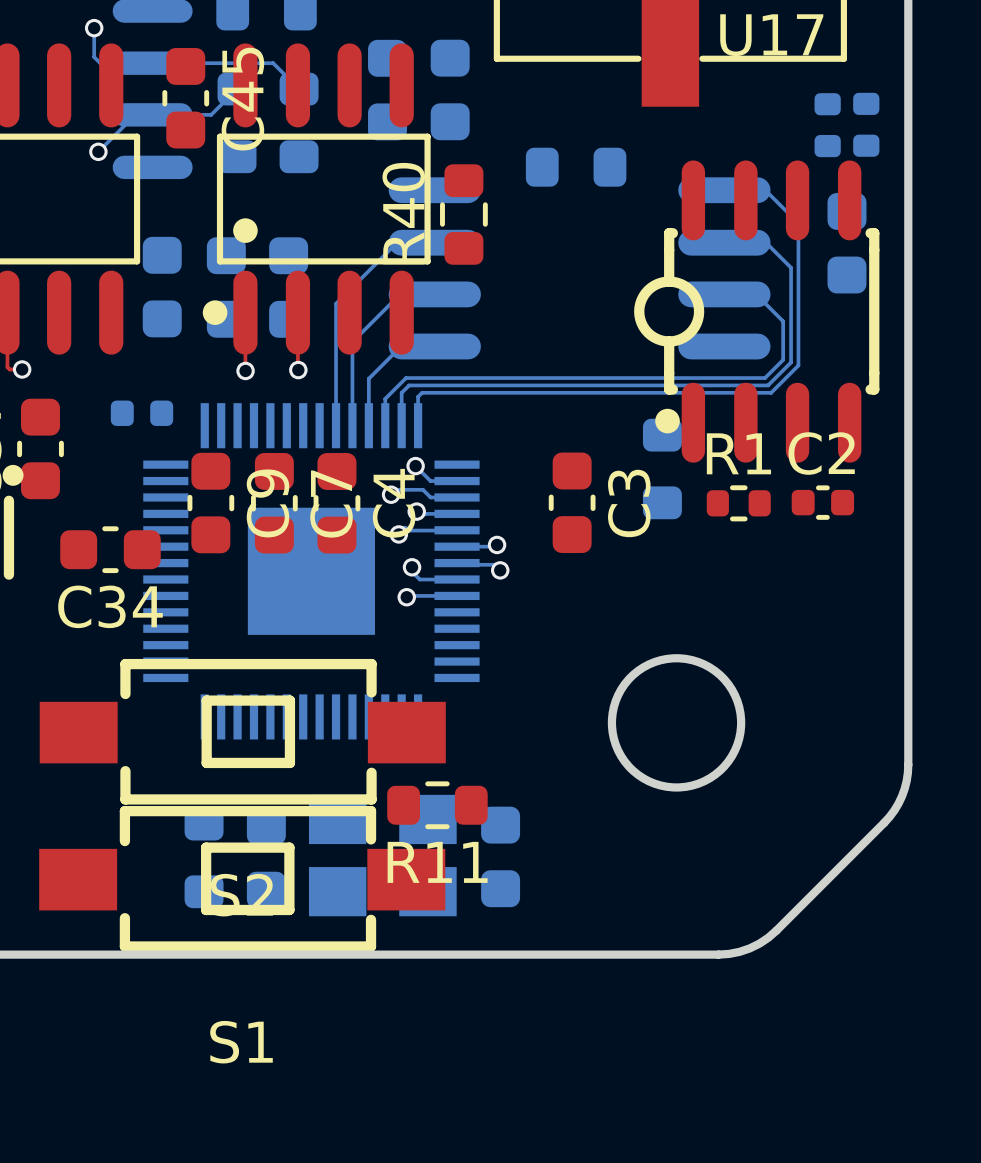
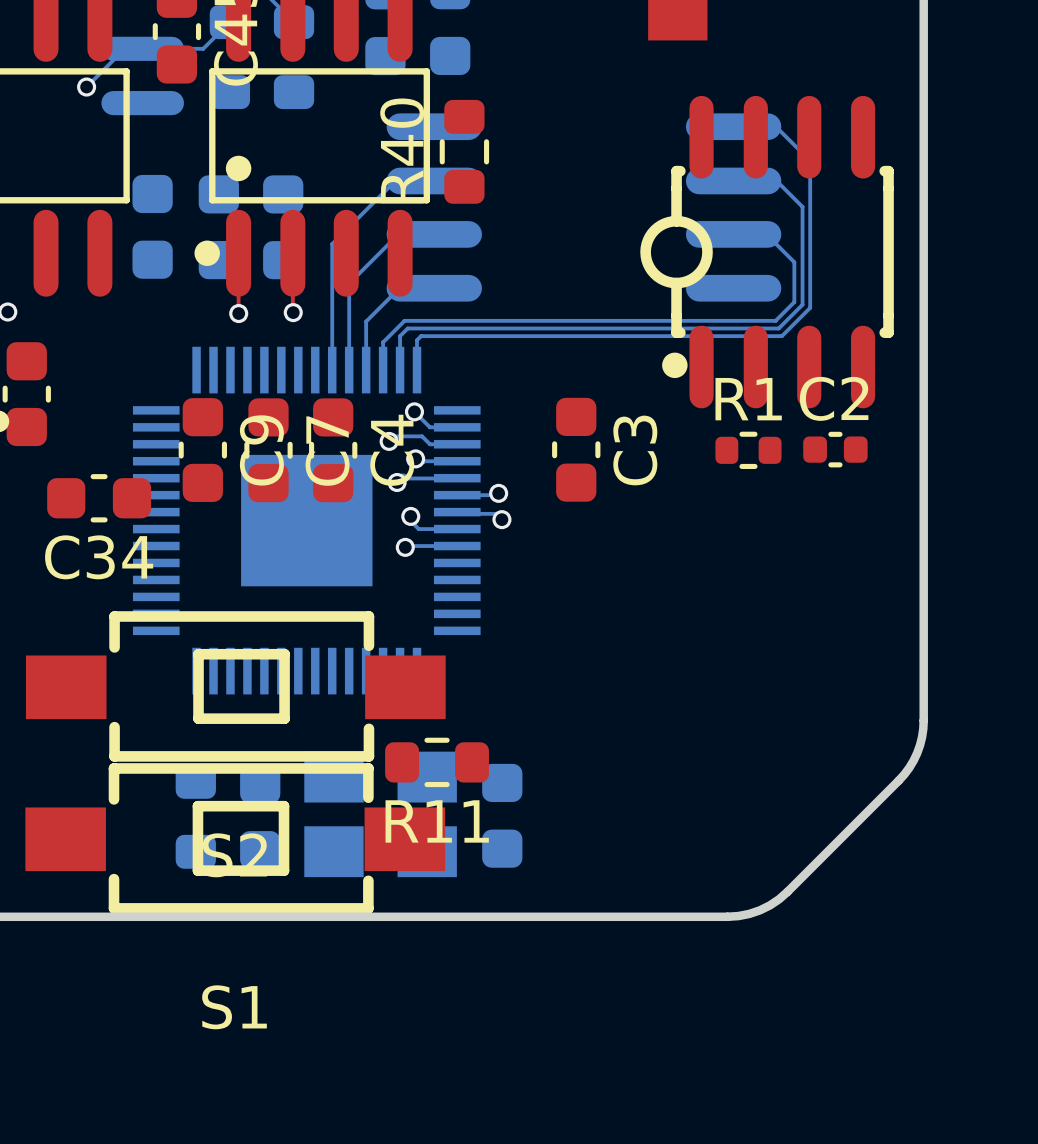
part: (866, 124) -> none
part: (827, 125) -> none
part: (576, 167) -> none
part: (846, 243) -> none
part: (141, 413) -> none
part: (662, 468) -> none
round board edge: [607, 654, 746, 792] -> none

